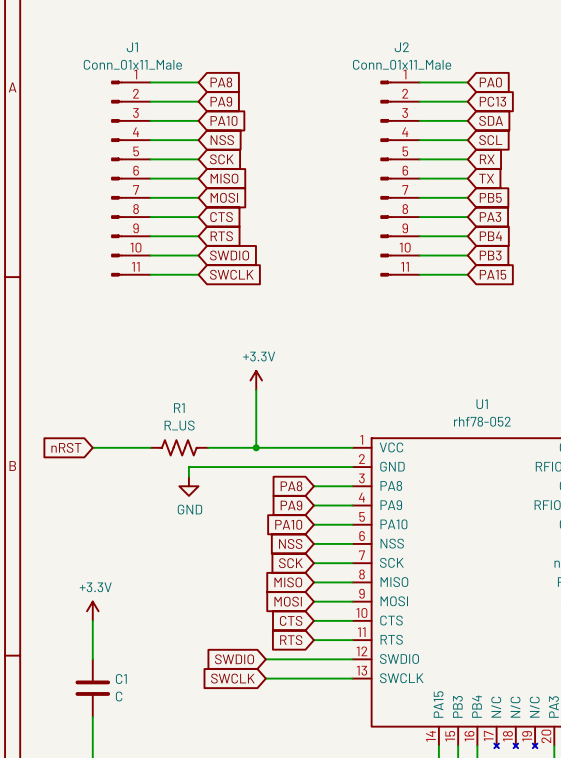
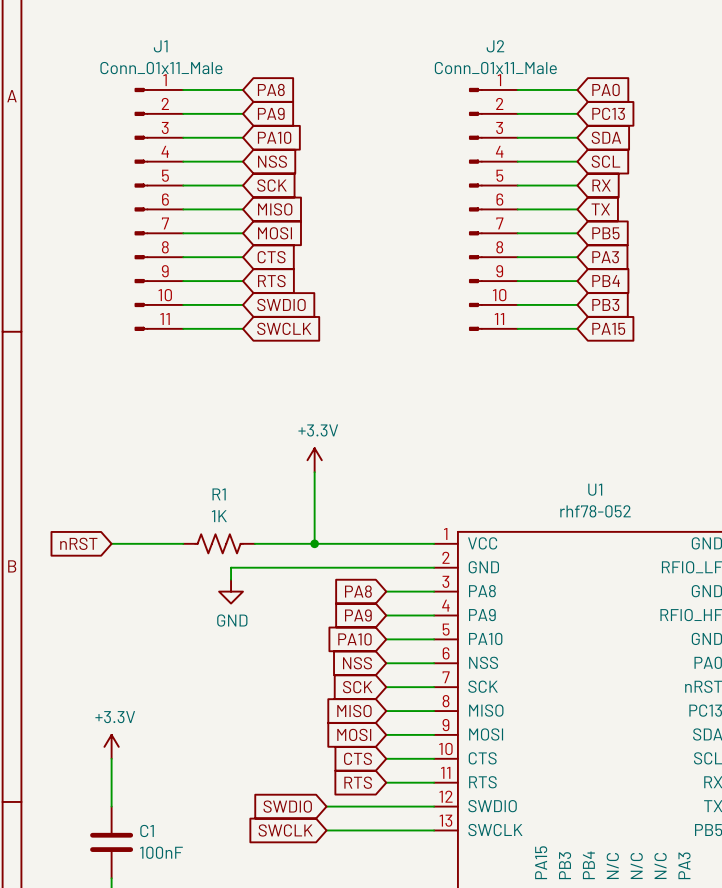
R1 value: R_US (179, 425) -> 1K (219, 516)
C1 value: C (119, 696) -> 100nF (161, 852)

